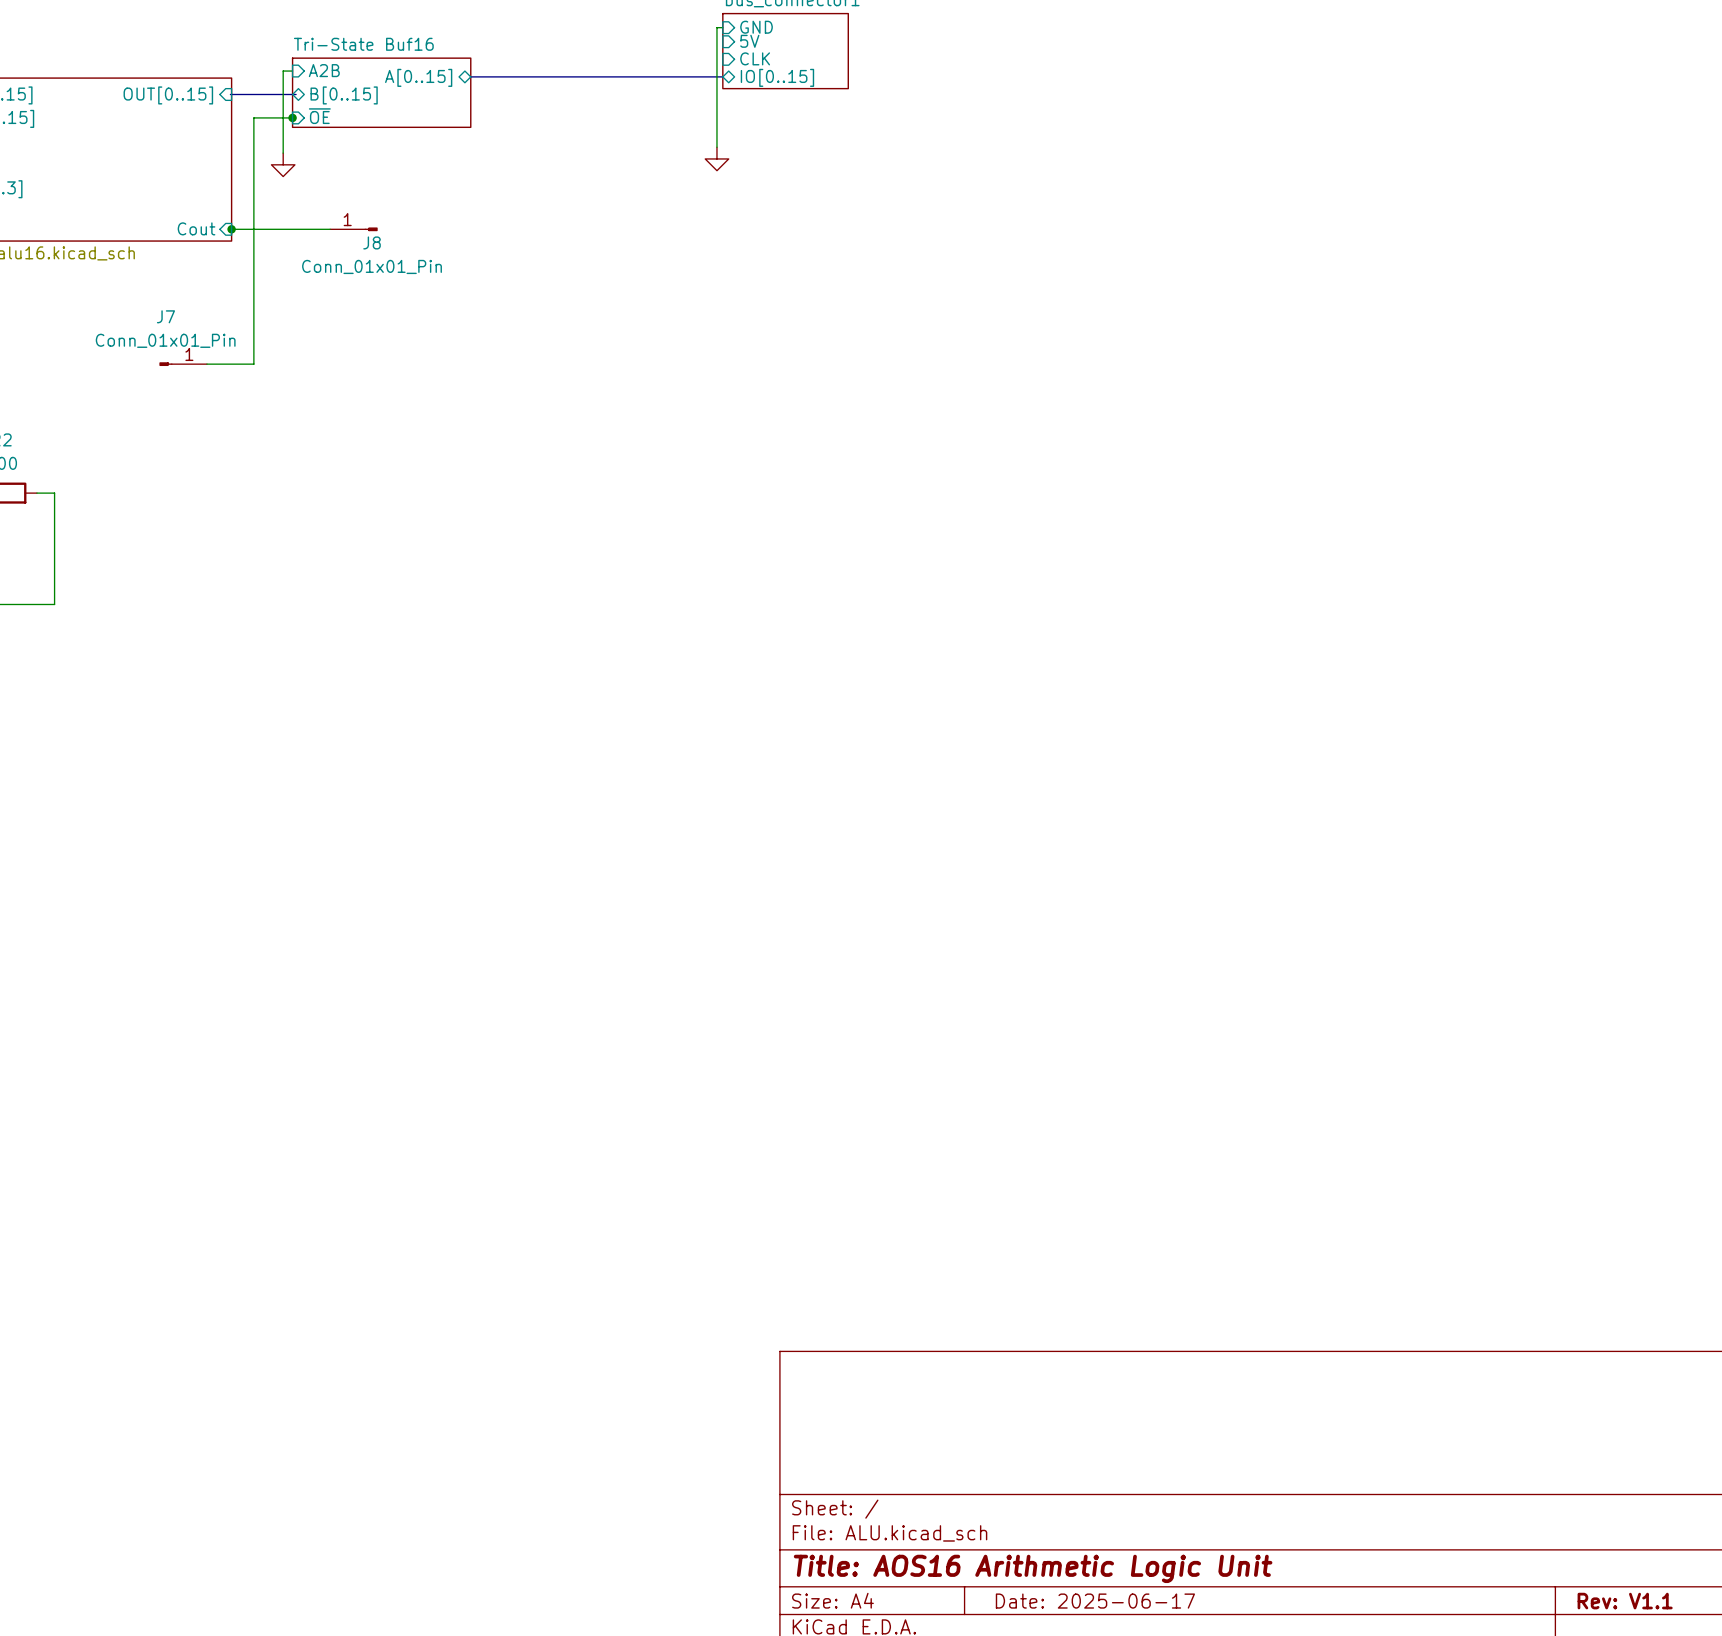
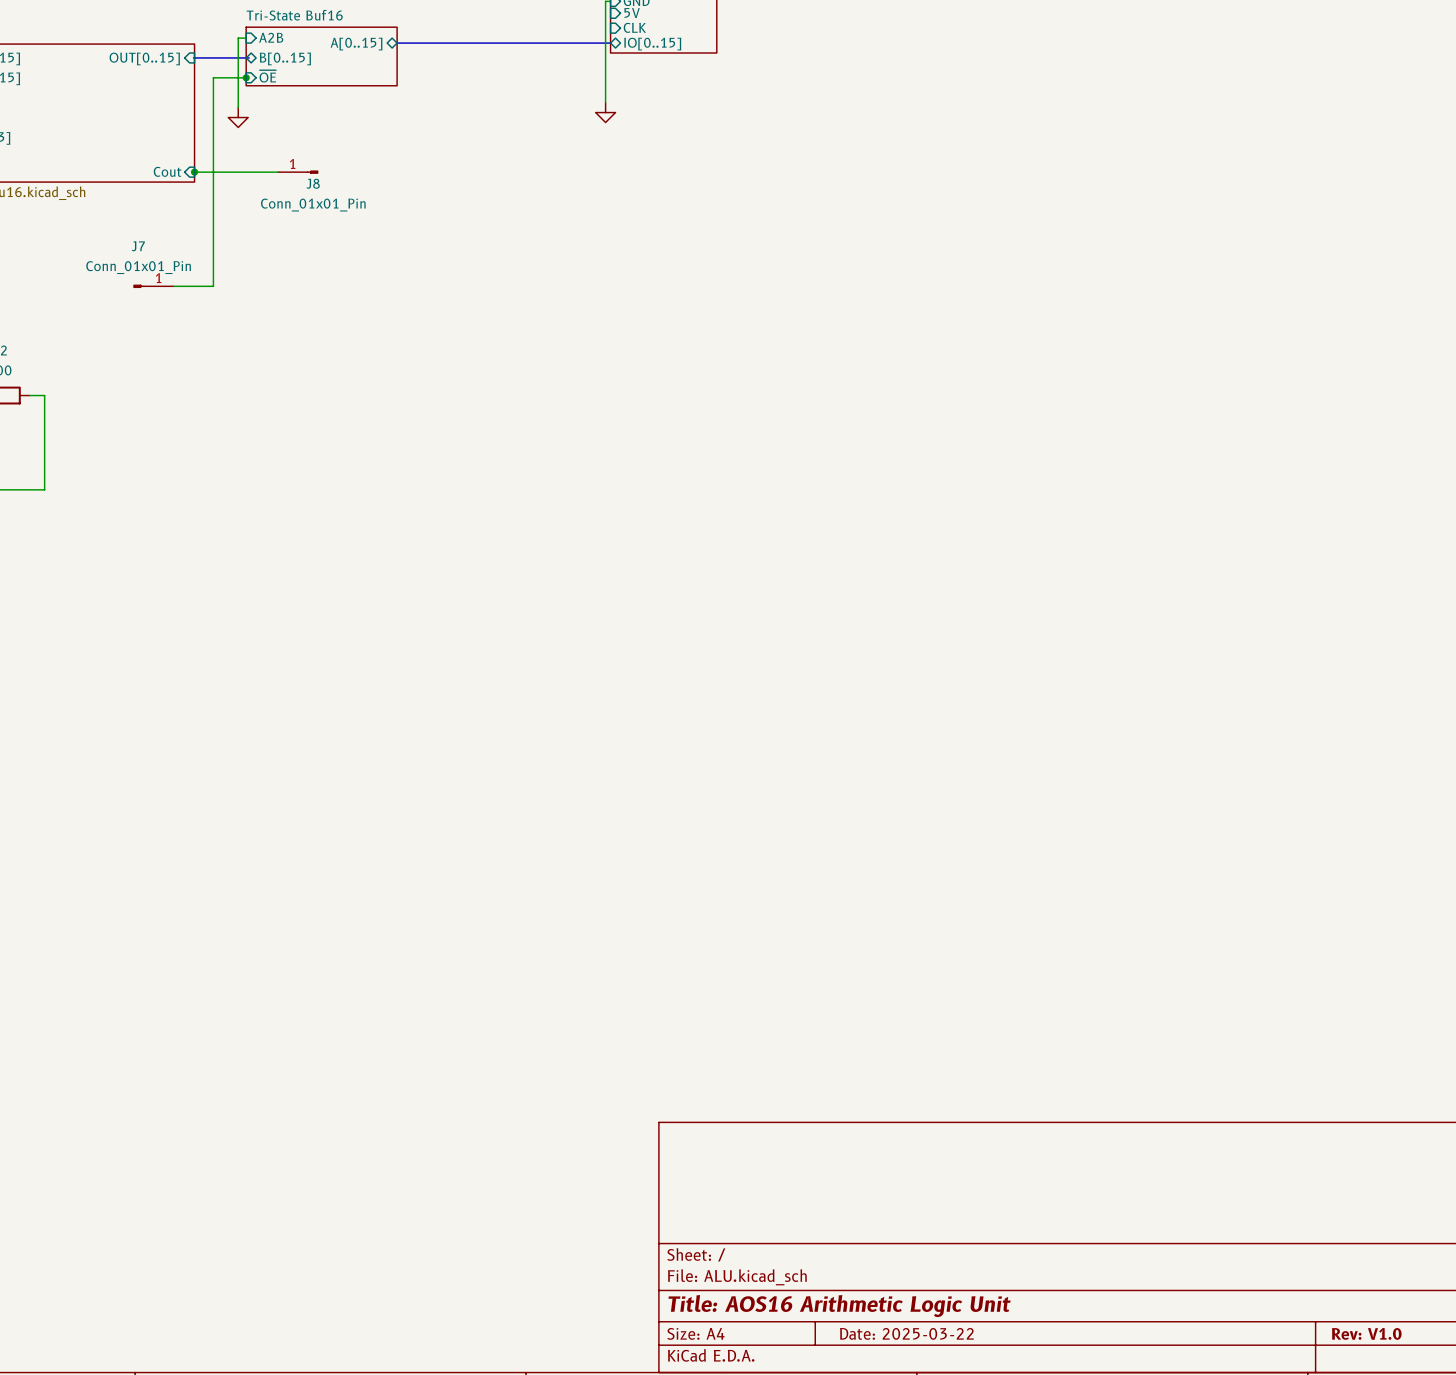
title block: Date: 2025-06-17 (1095, 1601) -> Date: 2025-03-22 (906, 1333)
title block: Rev: V1.1 (1625, 1601) -> Rev: V1.0 (1366, 1333)

